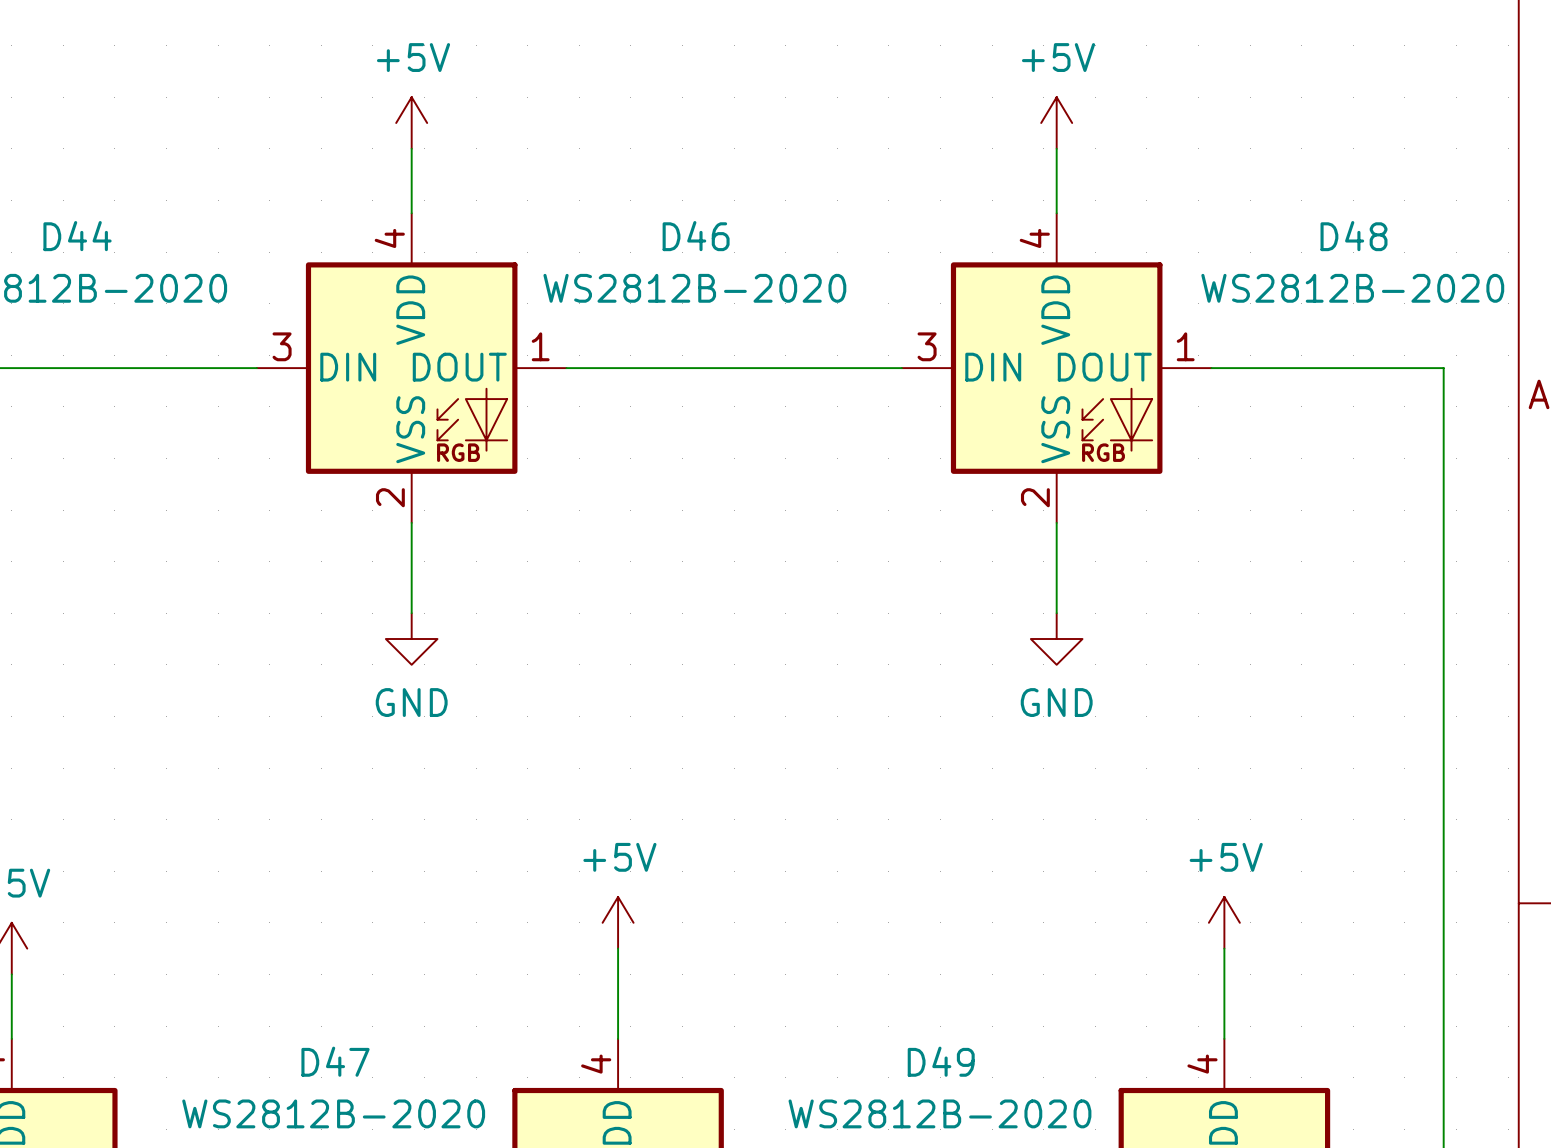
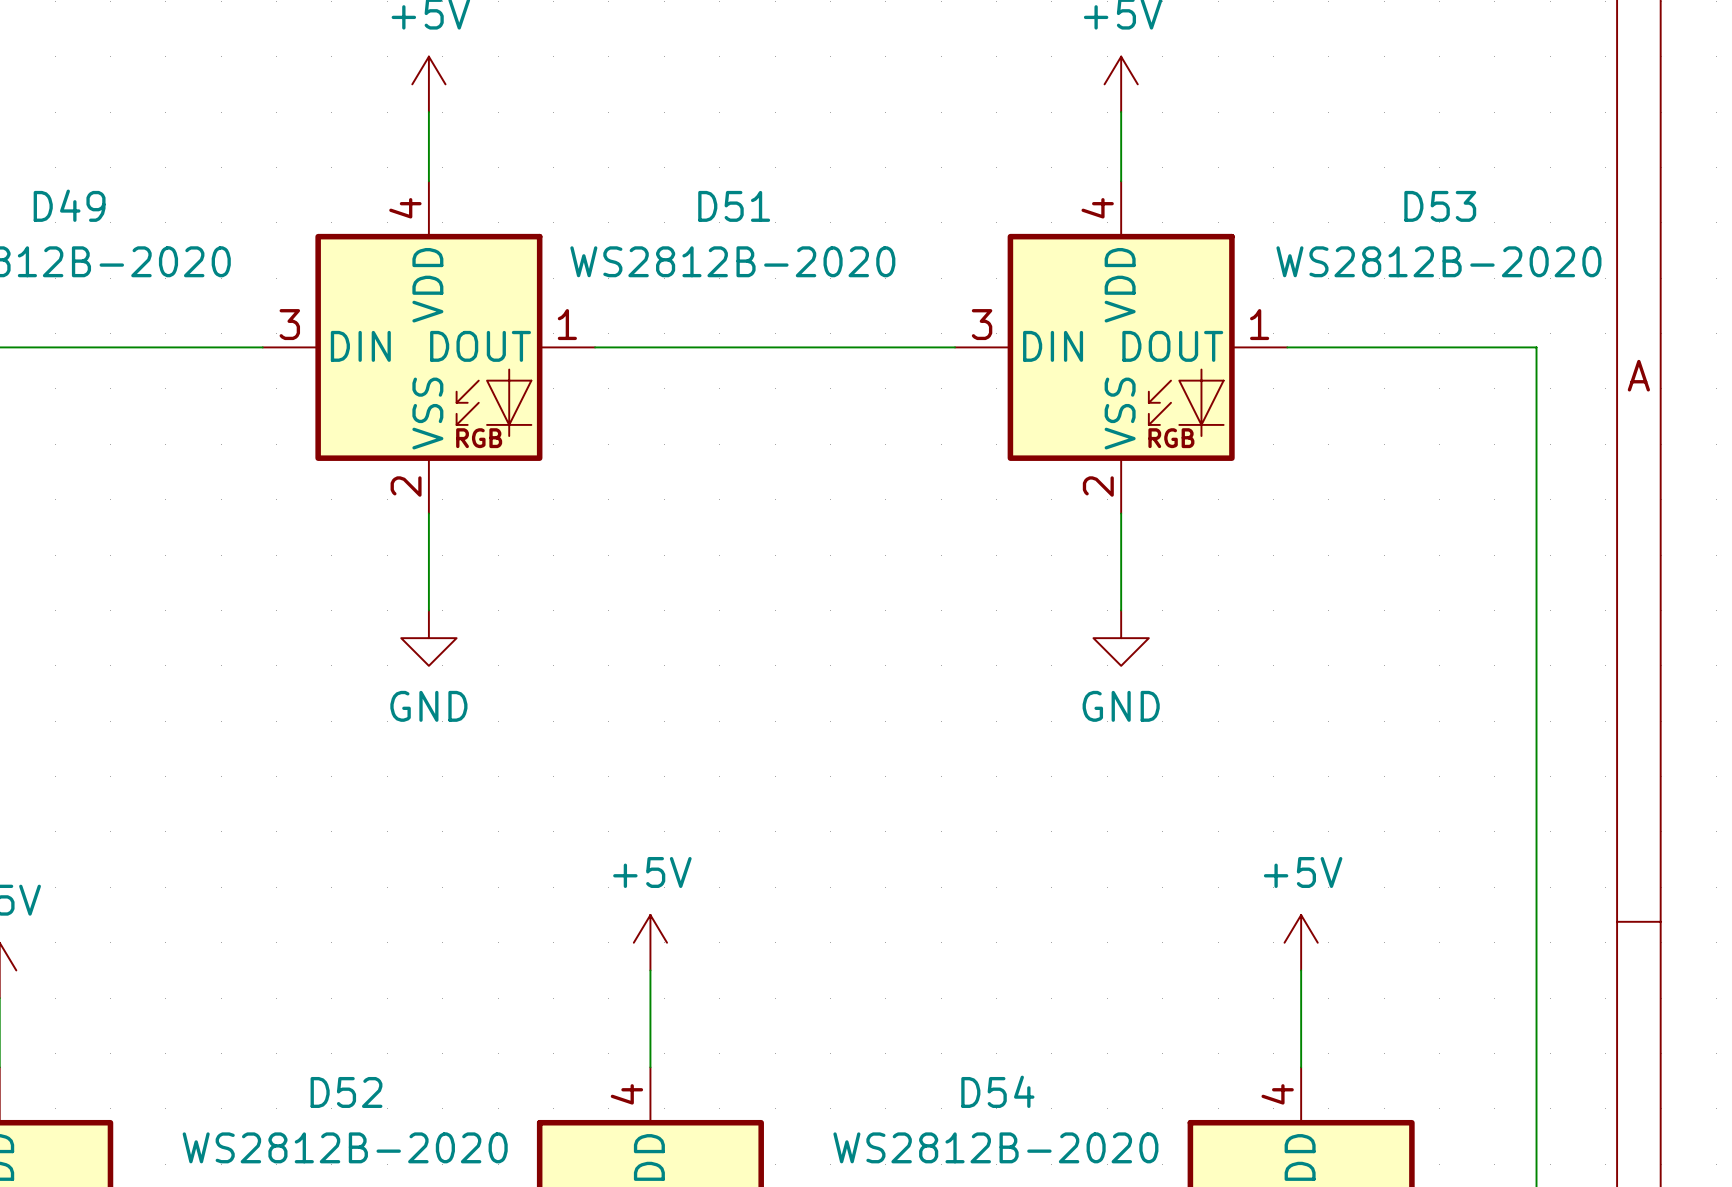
D44 name: D44 (77, 236) -> D49 (69, 205)
D46 name: D46 (696, 236) -> D51 (734, 206)
D48 name: D48 (1354, 236) -> D53 (1440, 206)
D47 name: D47 (335, 1061) -> D52 (346, 1092)
D49 name: D49 (941, 1061) -> D54 (997, 1091)

